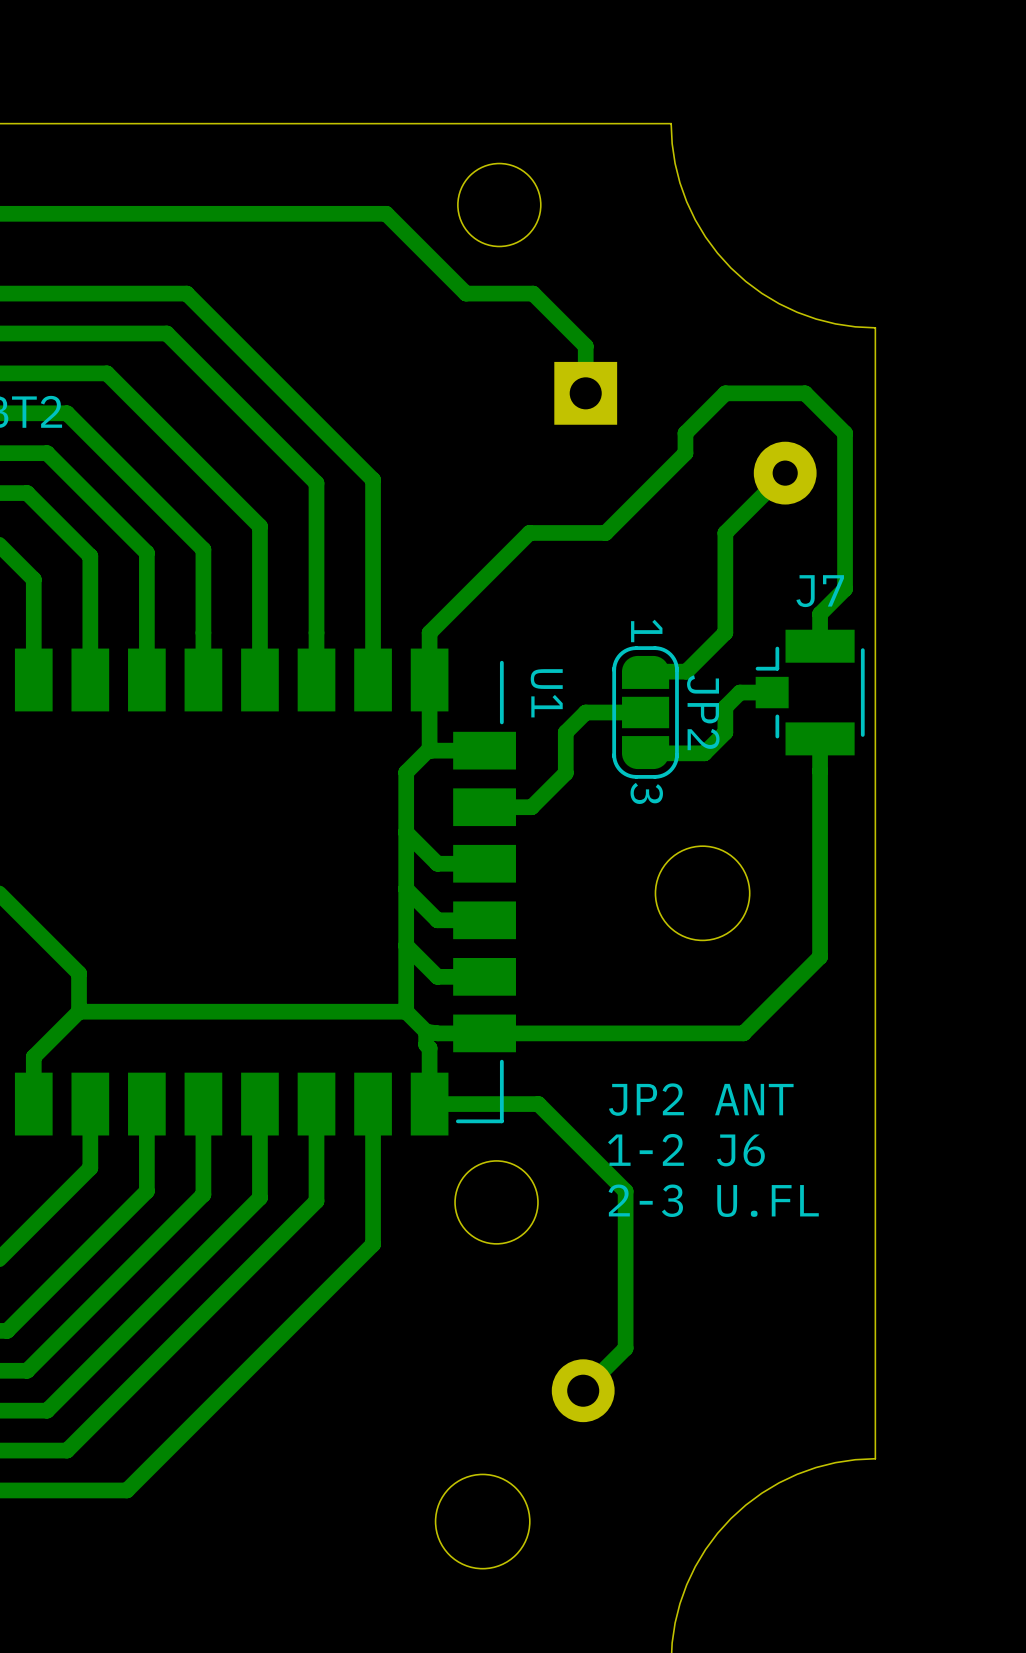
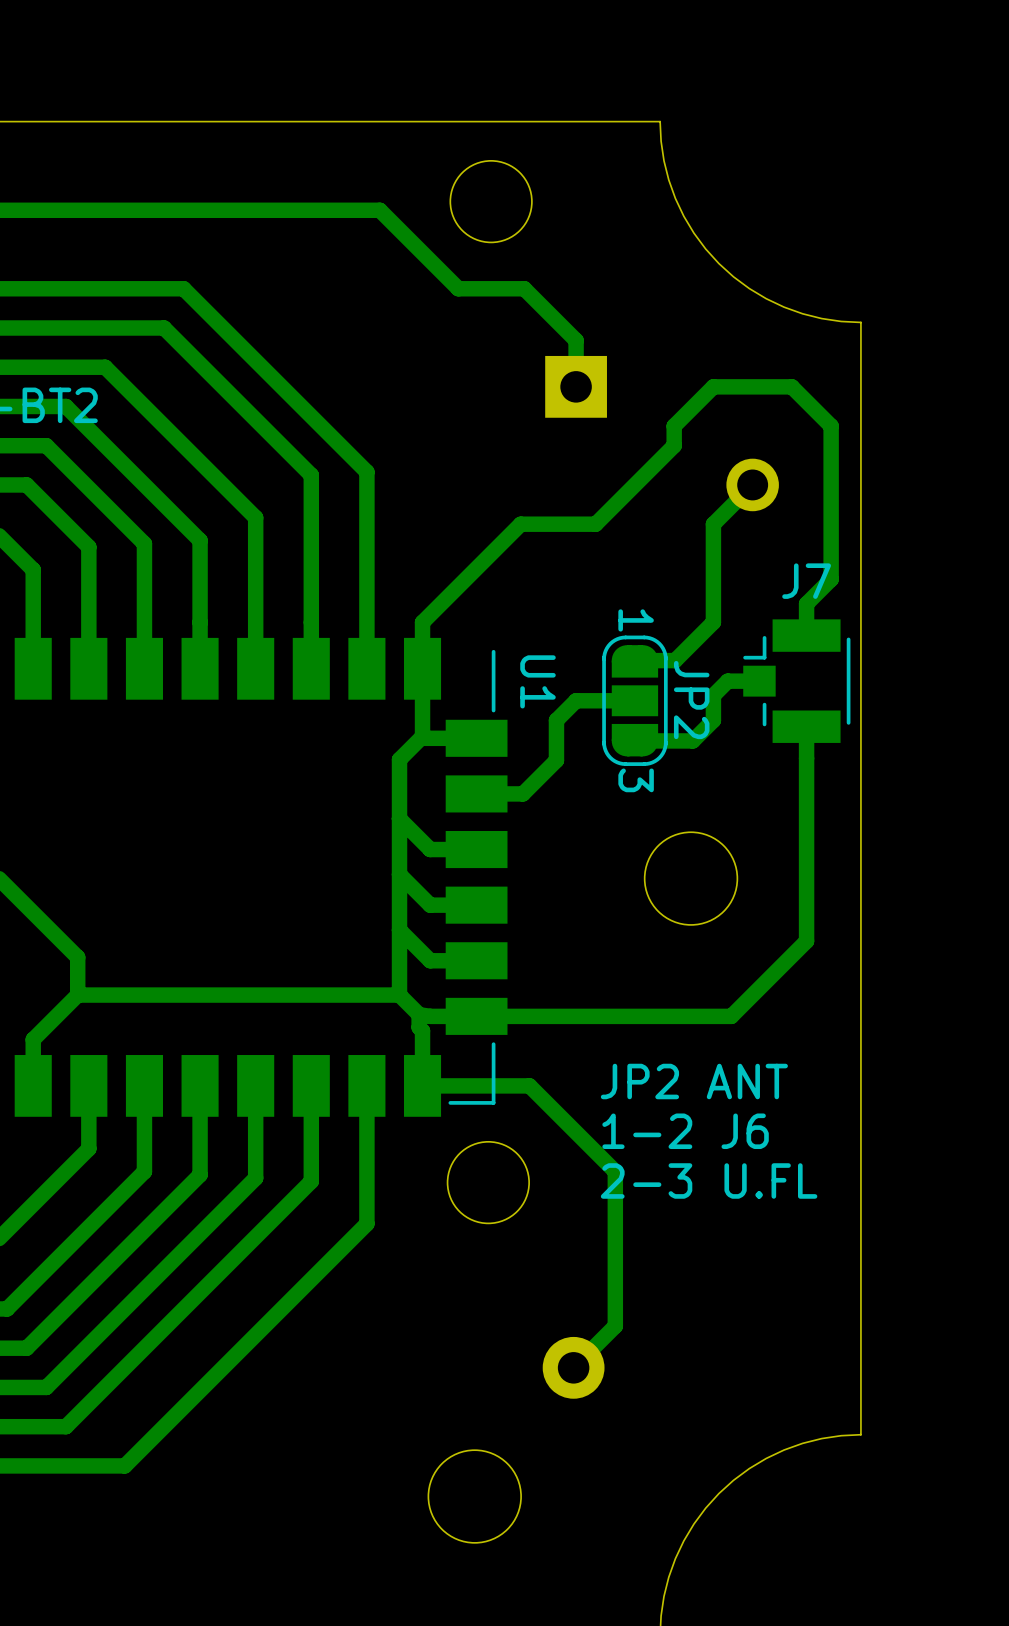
part footprint: [753, 441, 817, 505] -> [726, 458, 779, 512]

